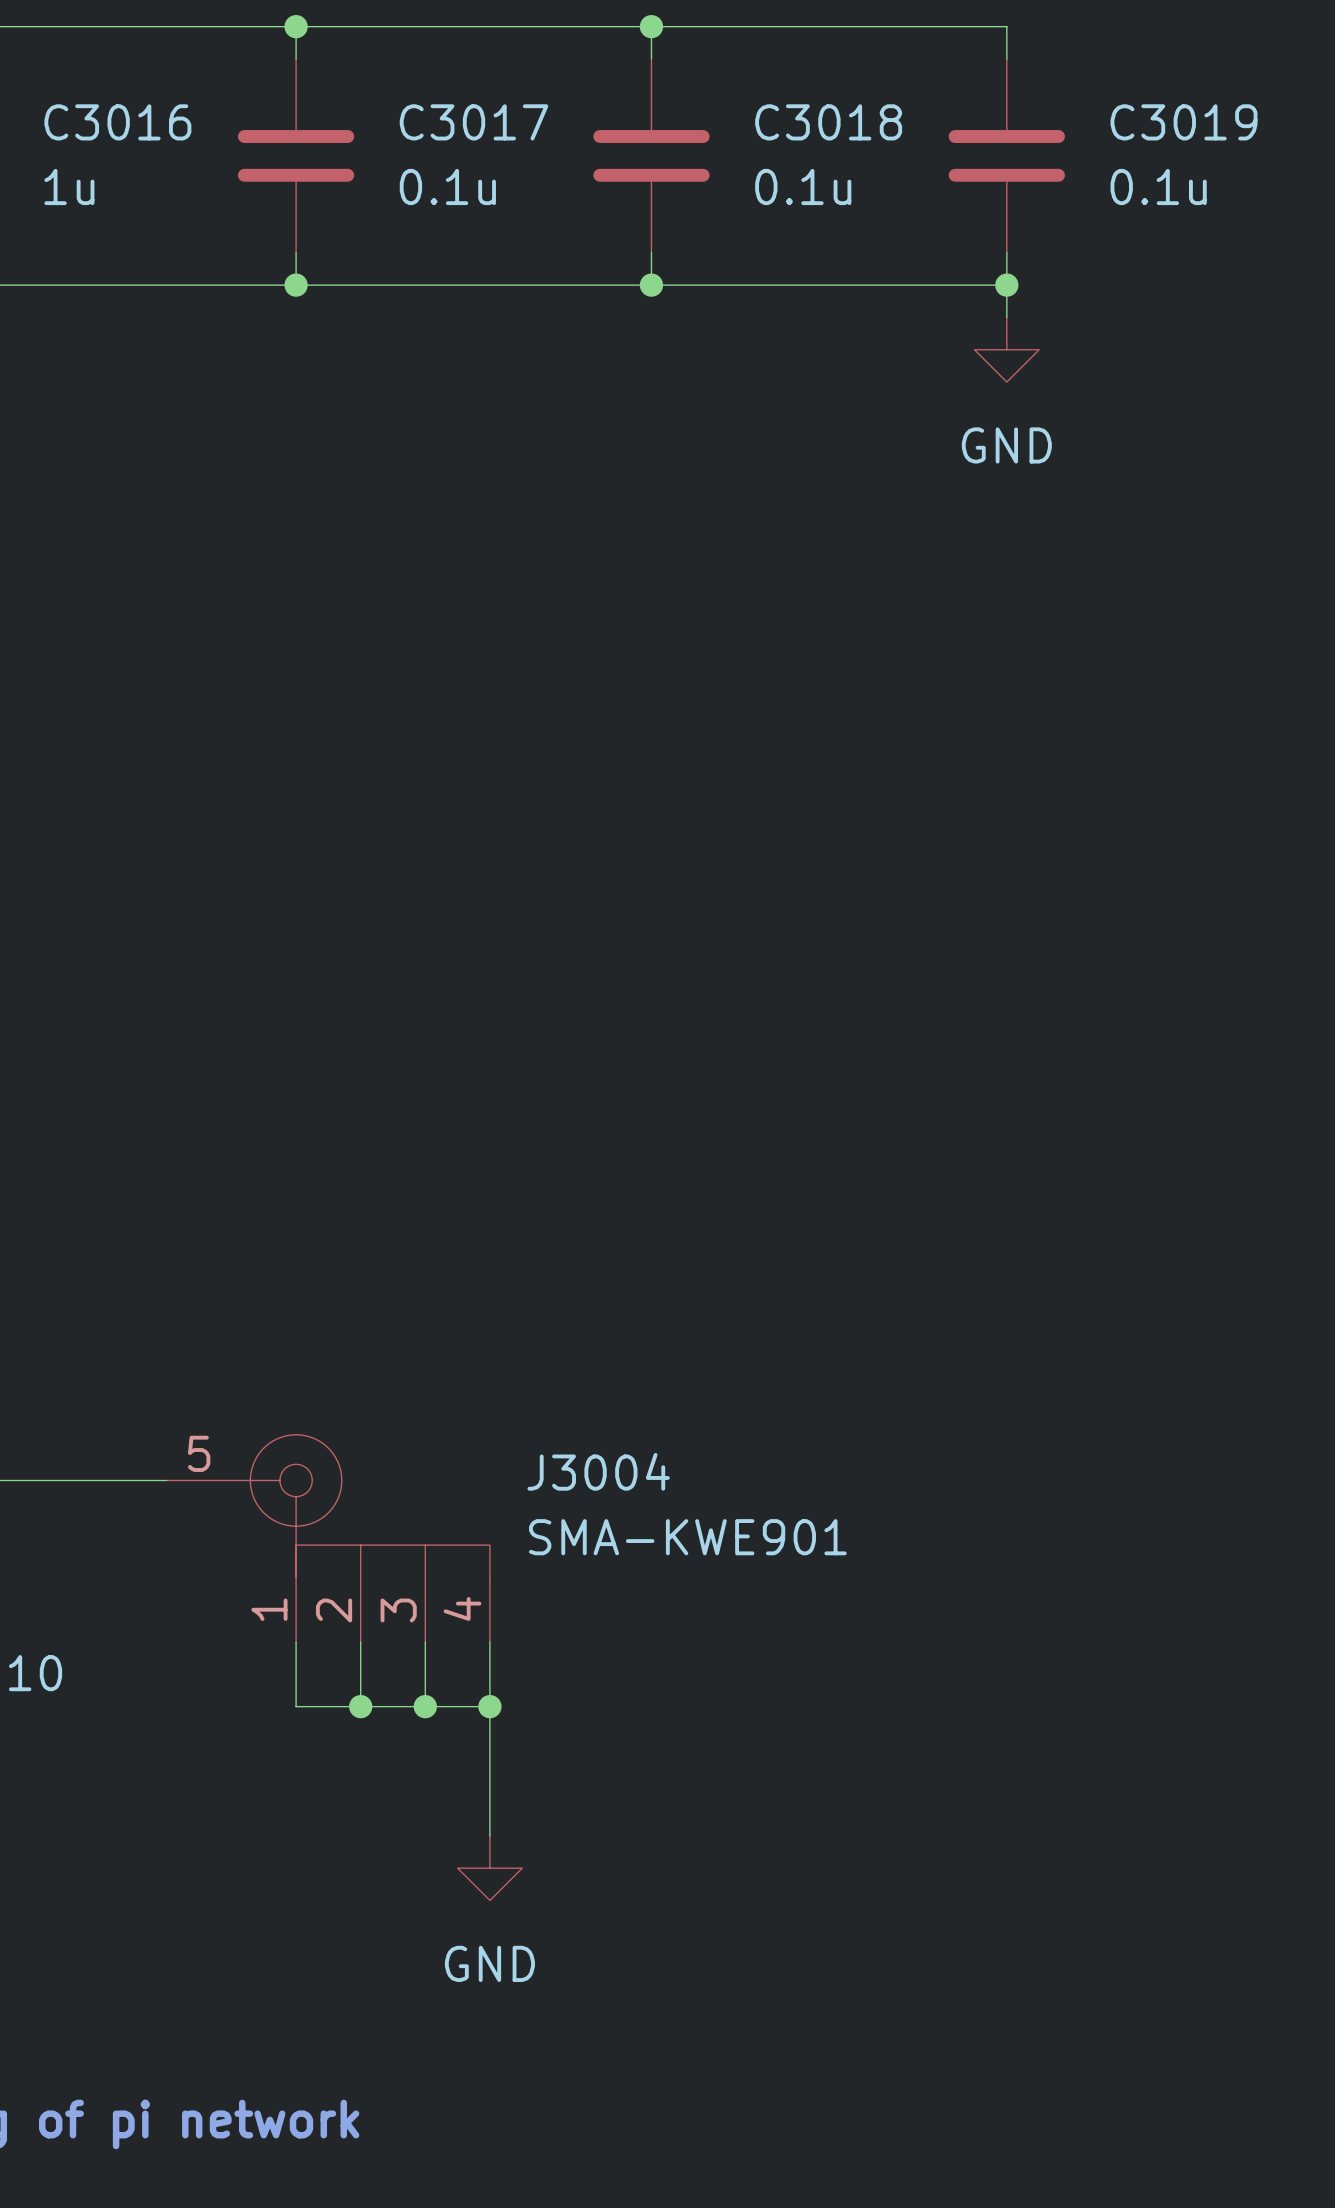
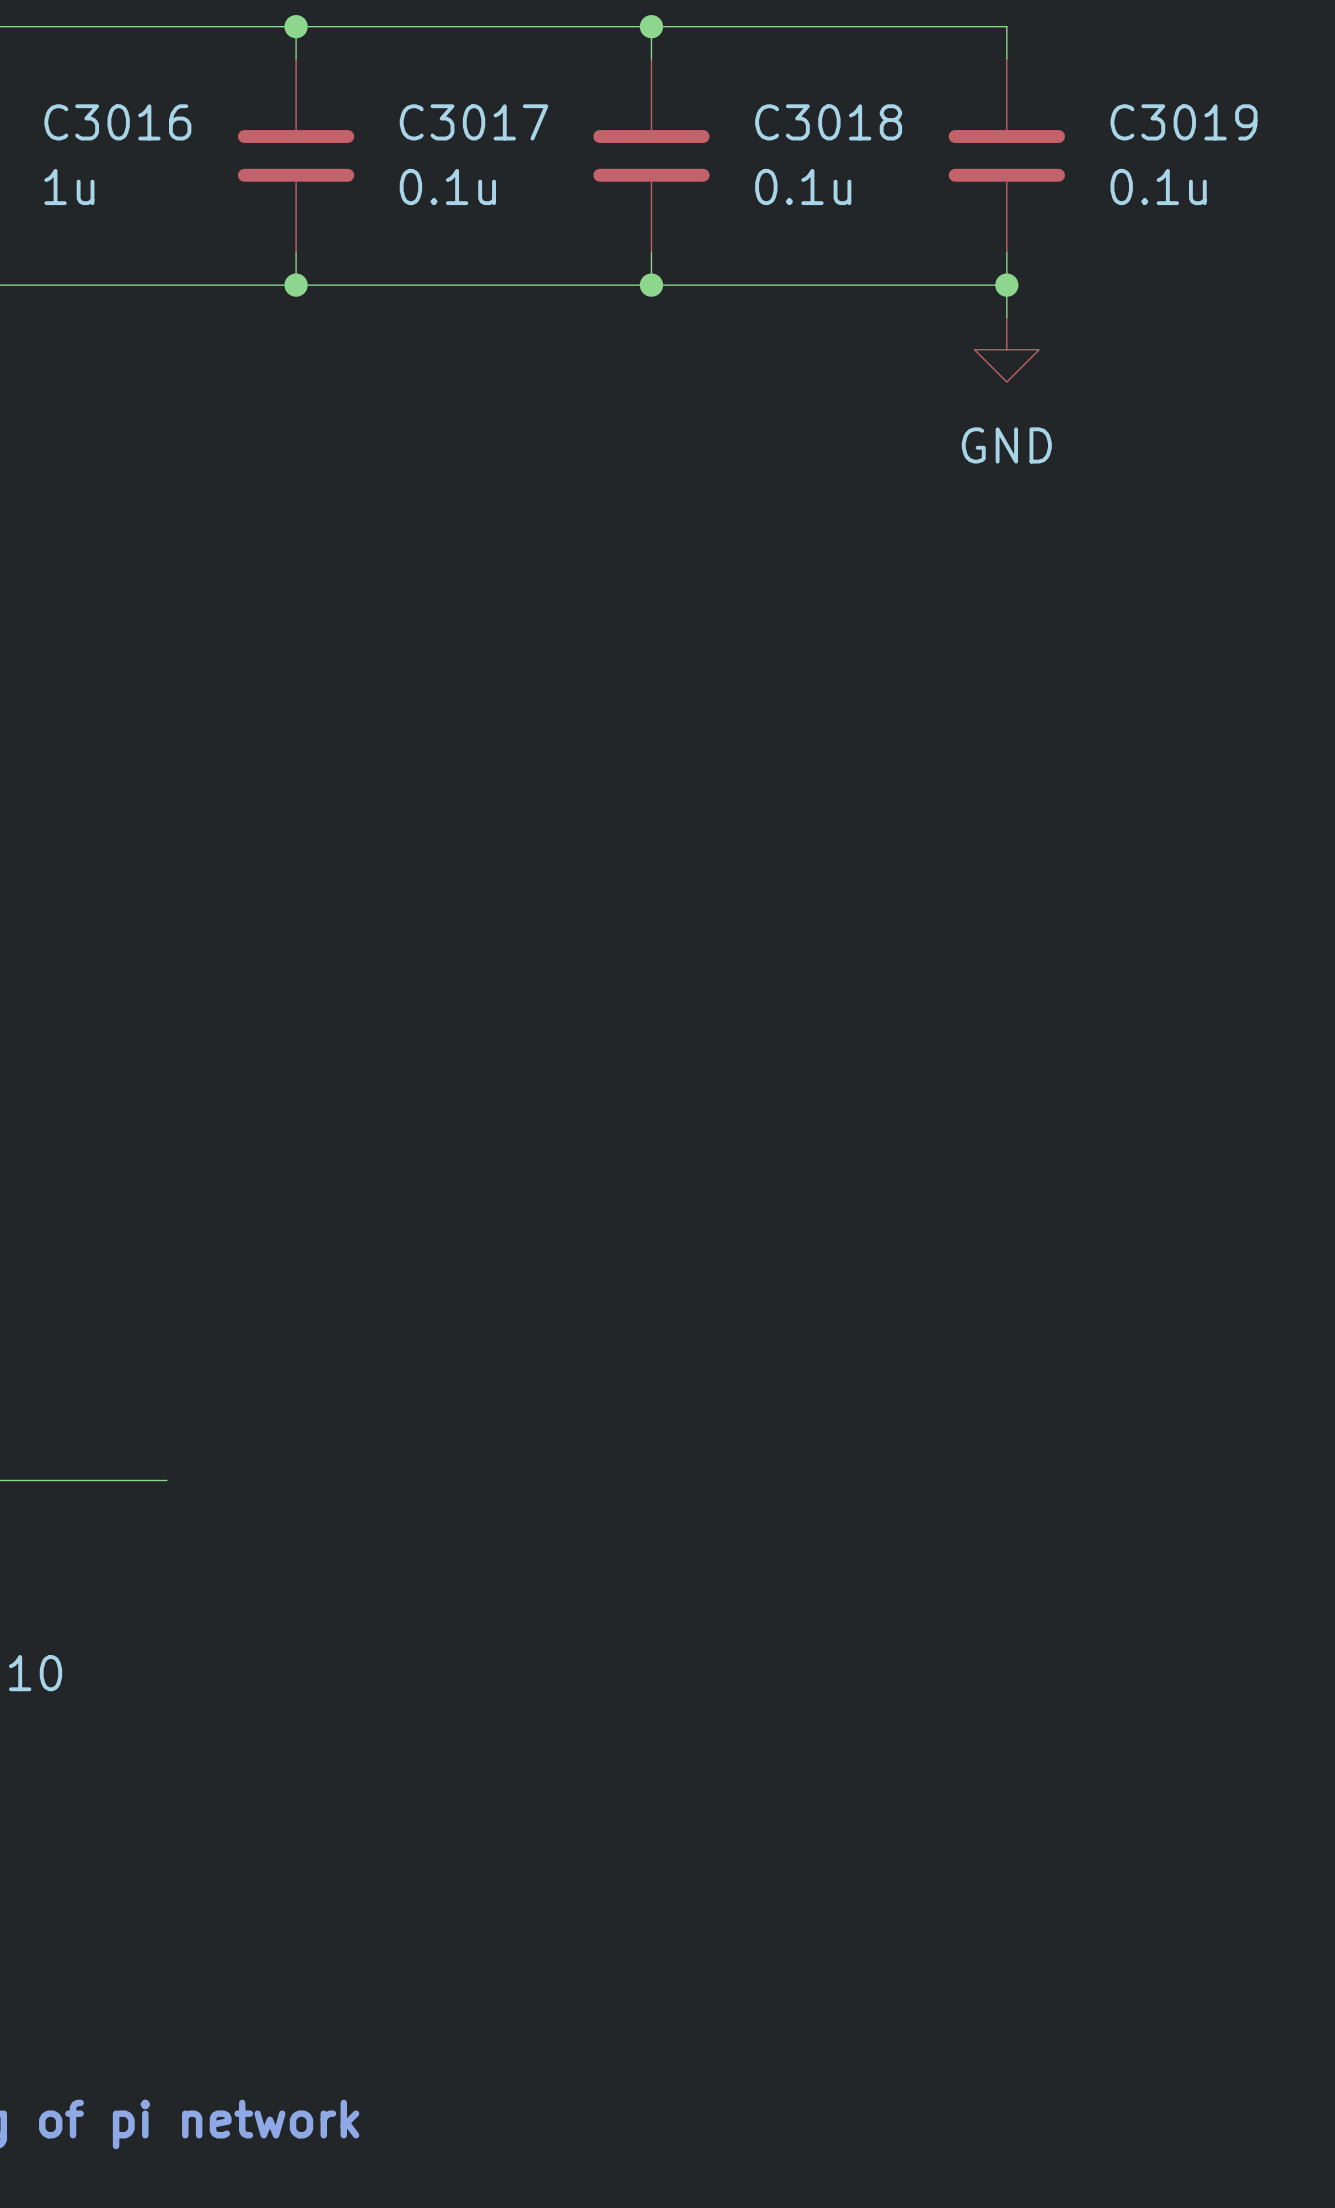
J3004: SMA-KWE901 (328, 1538) -> none
wire: (296, 1642) (296, 1706) (489, 1706) -> none
wire: (360, 1642) (360, 1706) -> none
wire: (425, 1642) (425, 1706) -> none
wire: (489, 1642) (489, 1835) -> none
junction: (360, 1706) -> none
junction: (425, 1706) -> none
junction: (489, 1706) -> none
power symbol: GND (489, 1868) -> none

